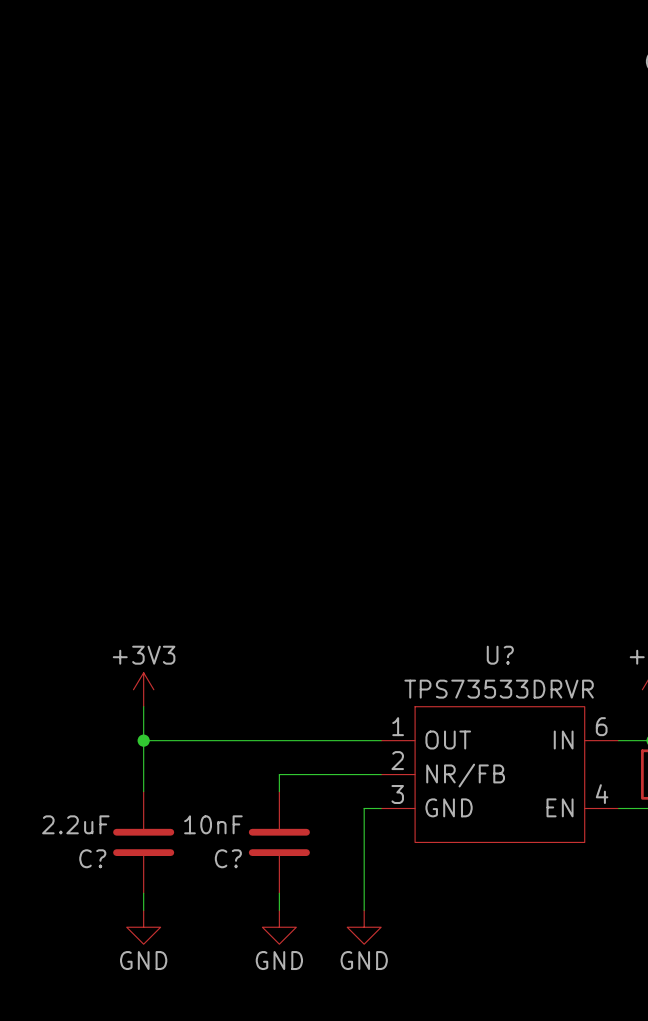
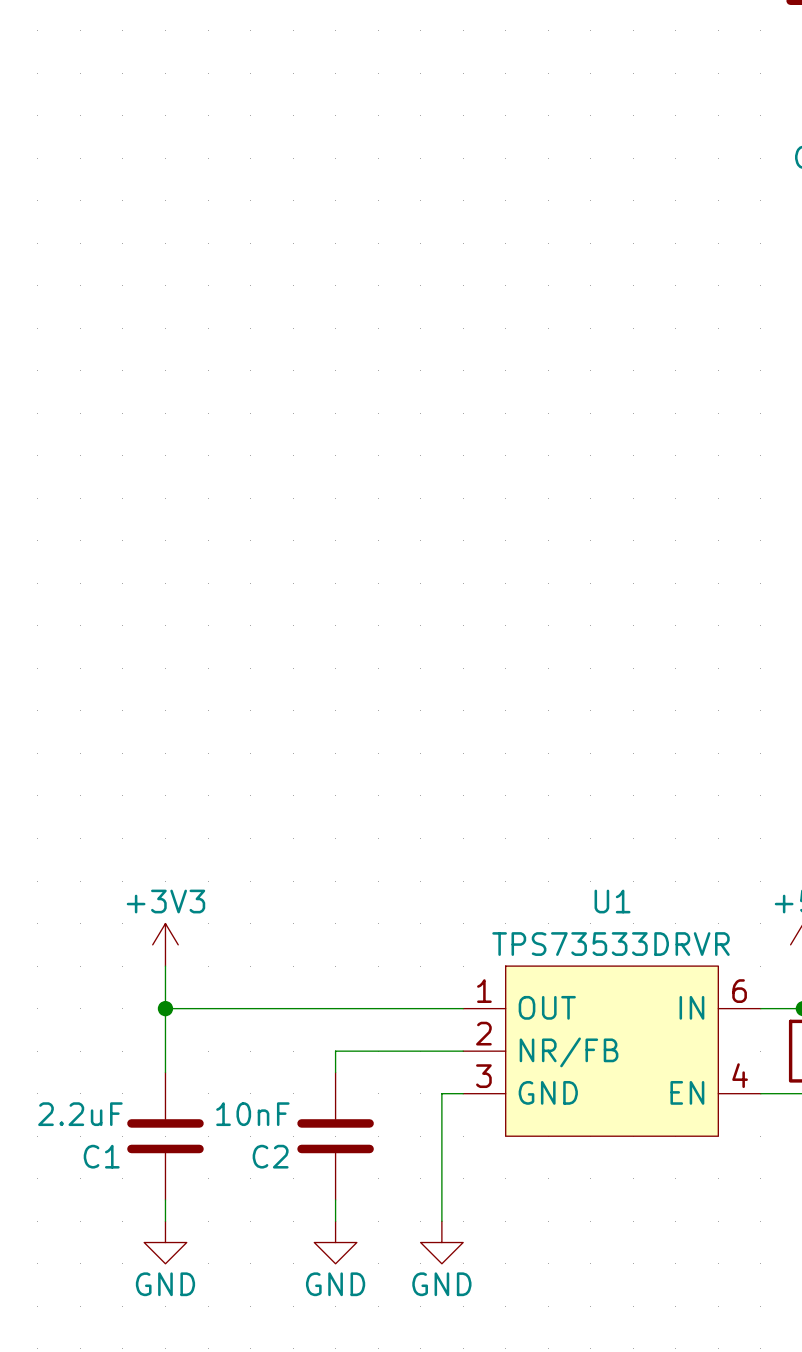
U? name: U? (500, 655) -> U1 (612, 901)
C? name: C? (92, 858) -> C1 (101, 1156)
C? name: C? (228, 858) -> C2 (270, 1156)

